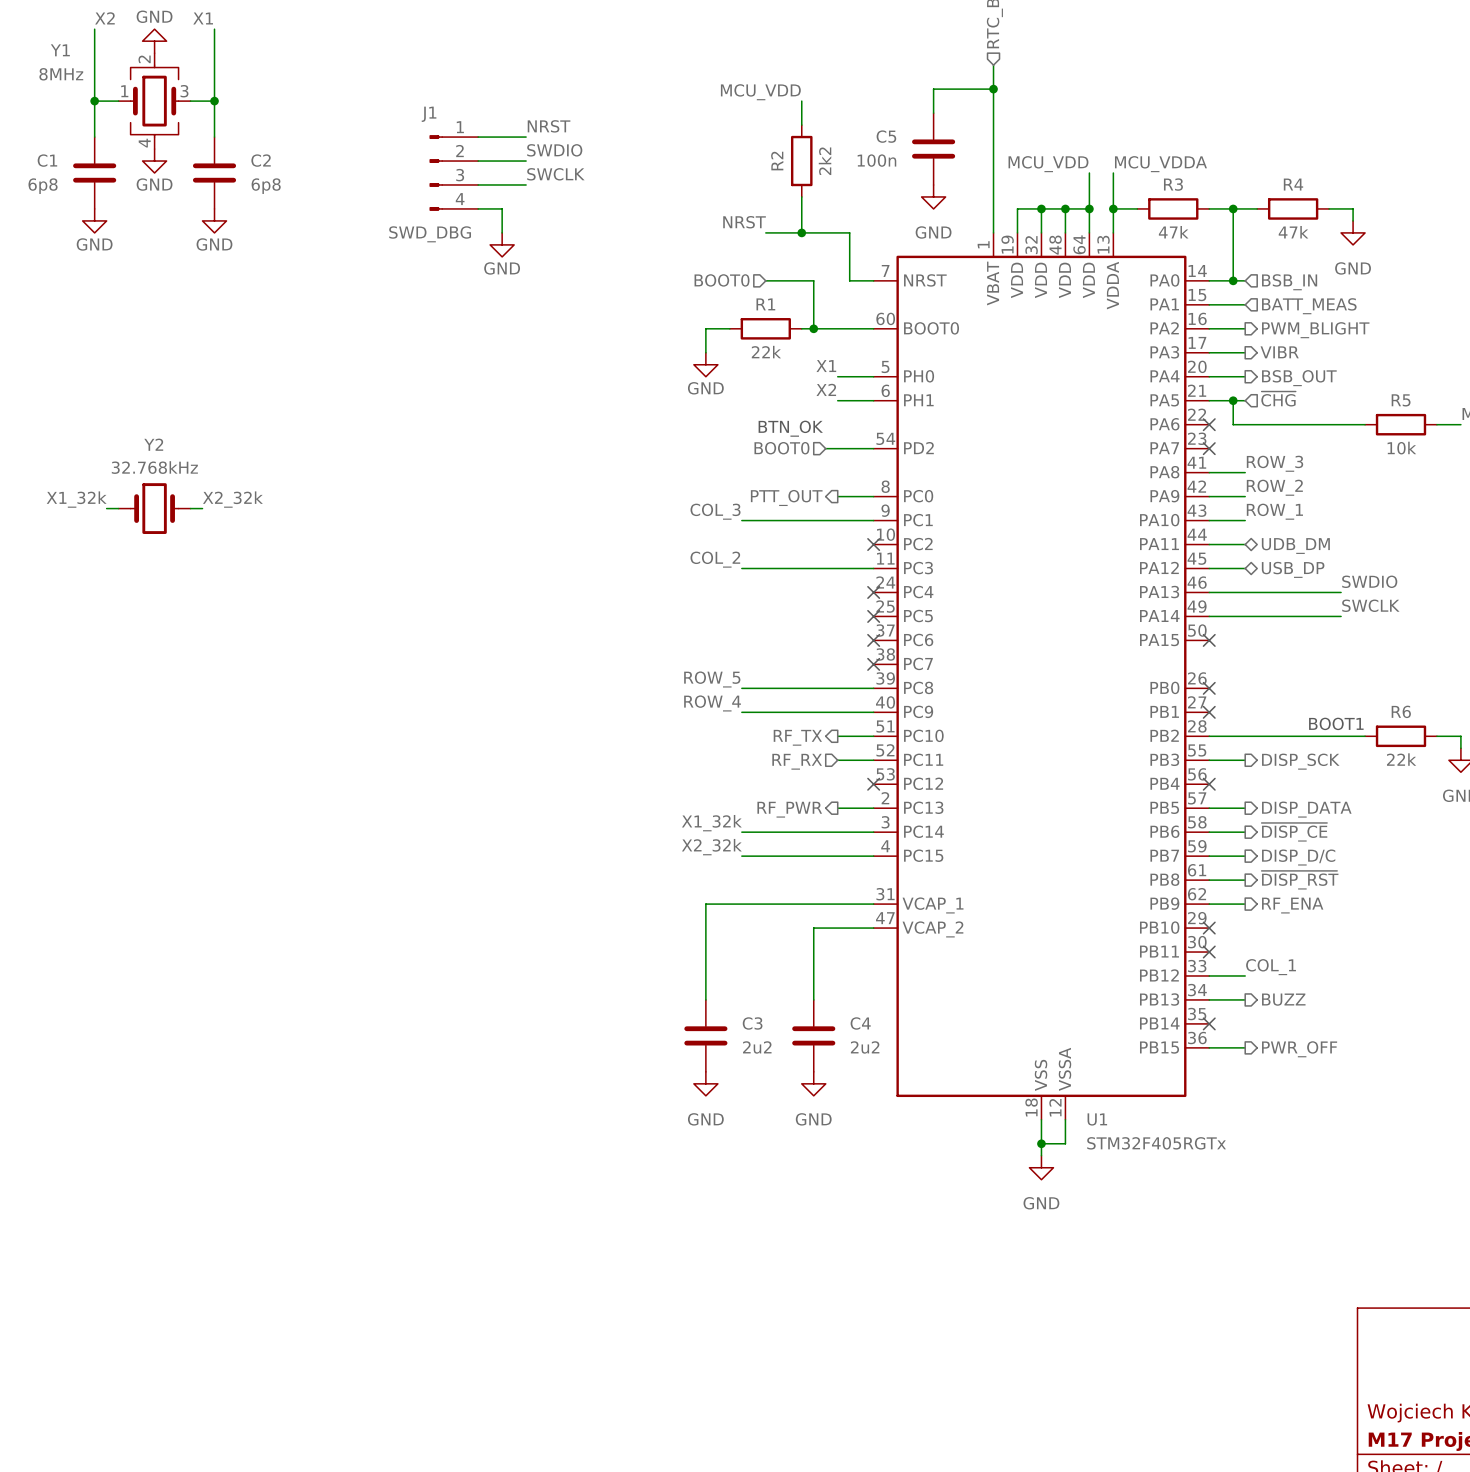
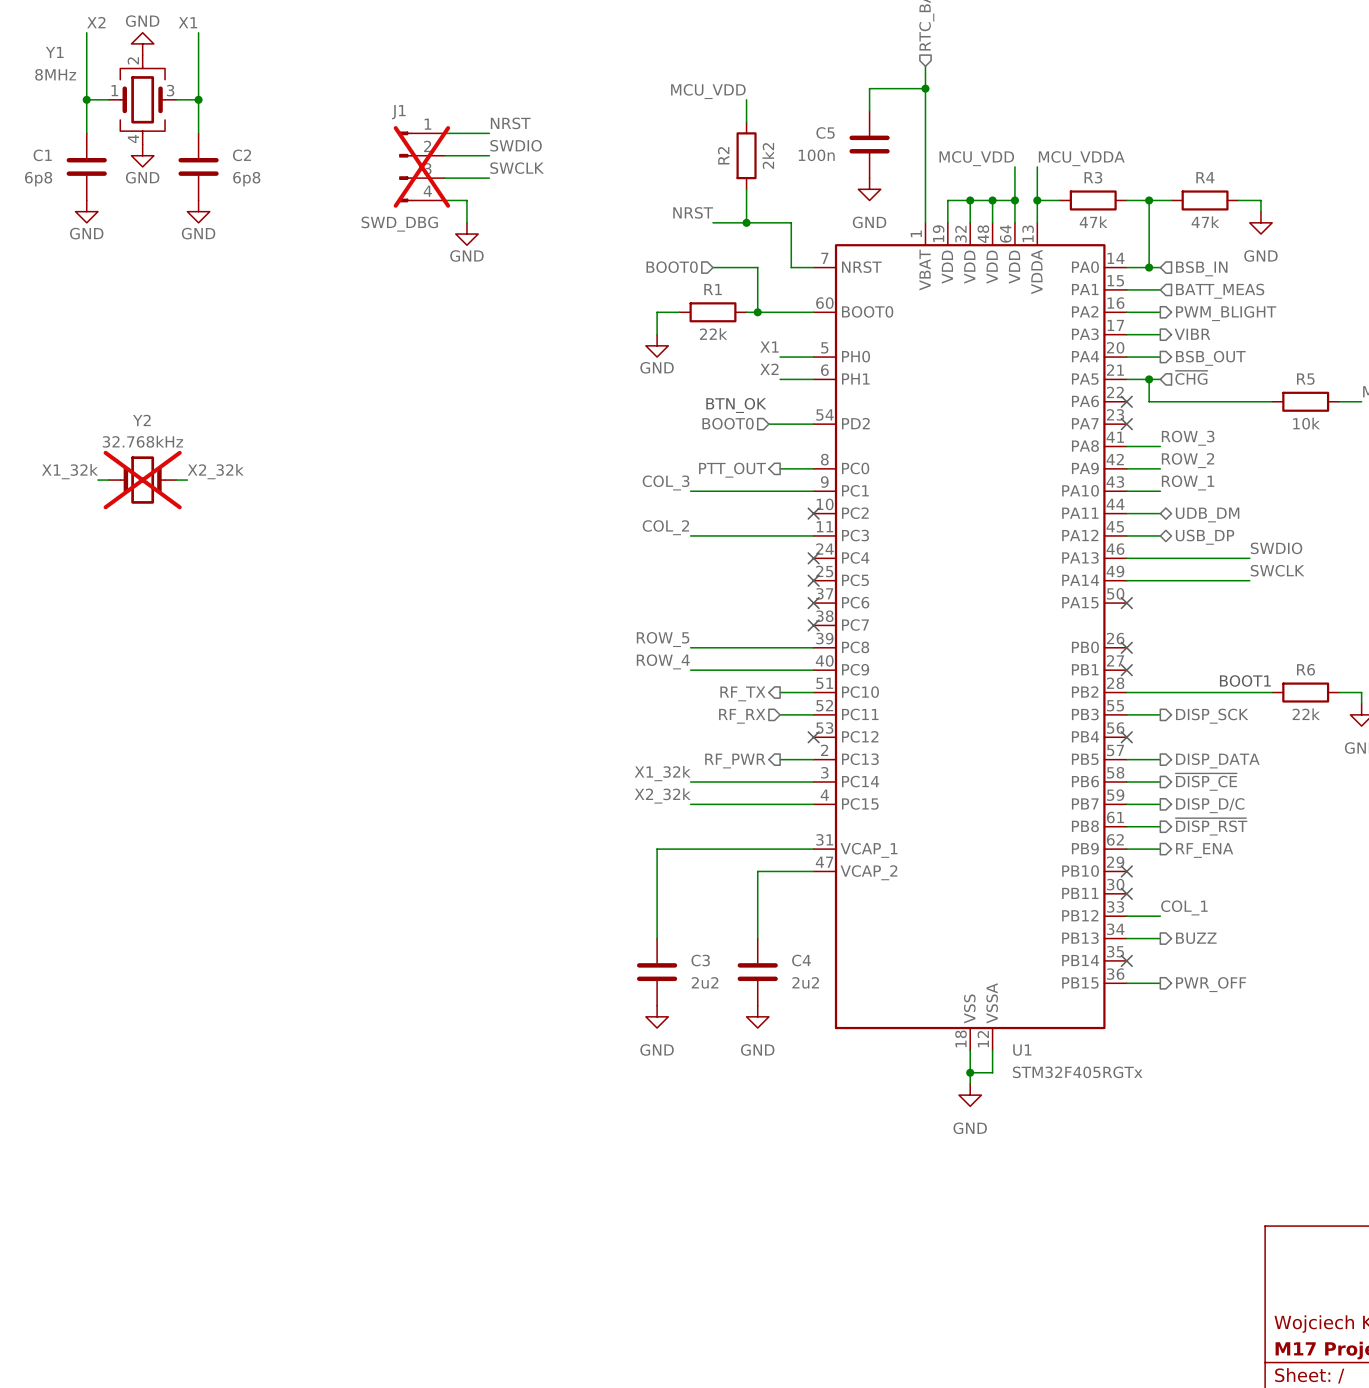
J1 do-not-place cross: none -> (421, 166)
Y2 do-not-place cross: none -> (142, 480)

